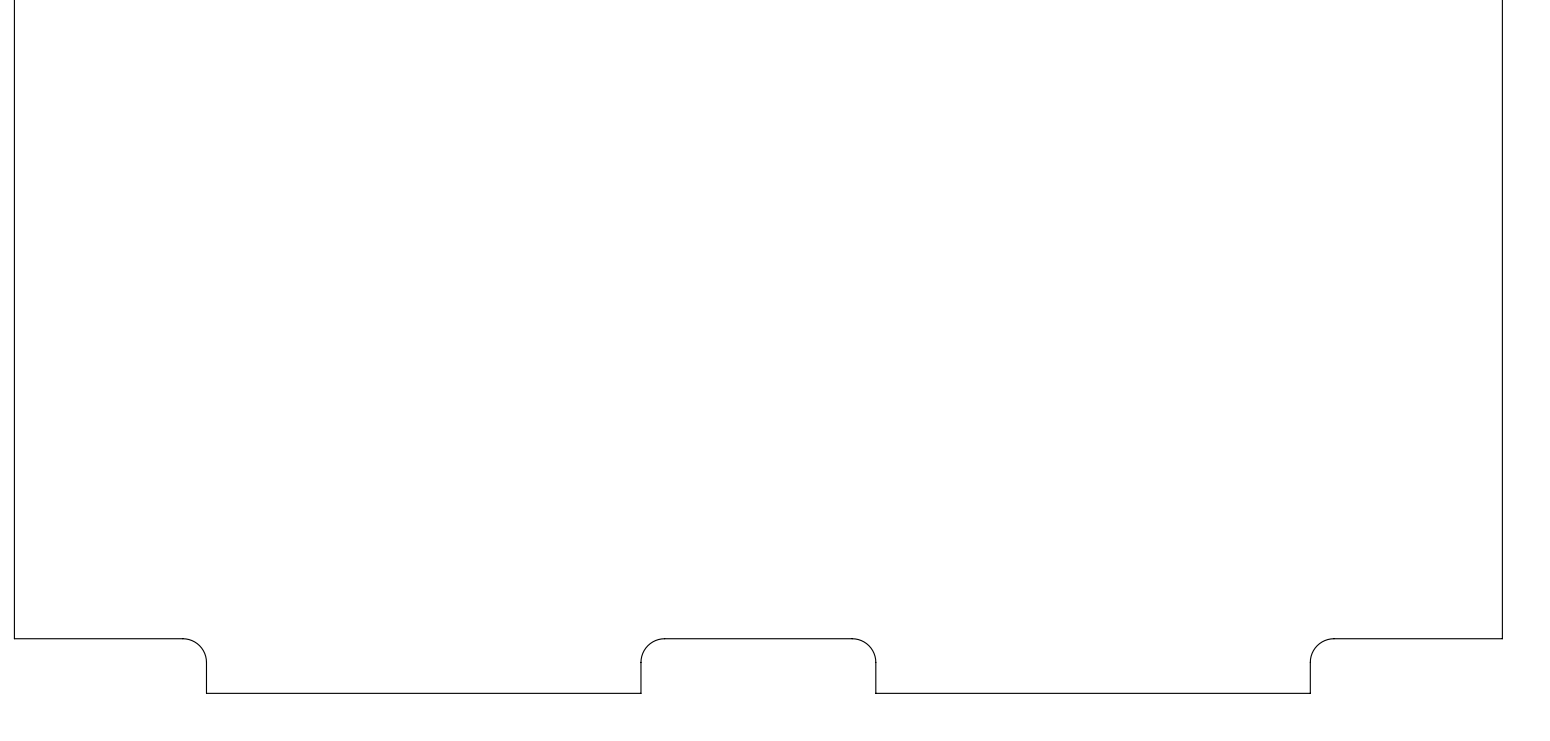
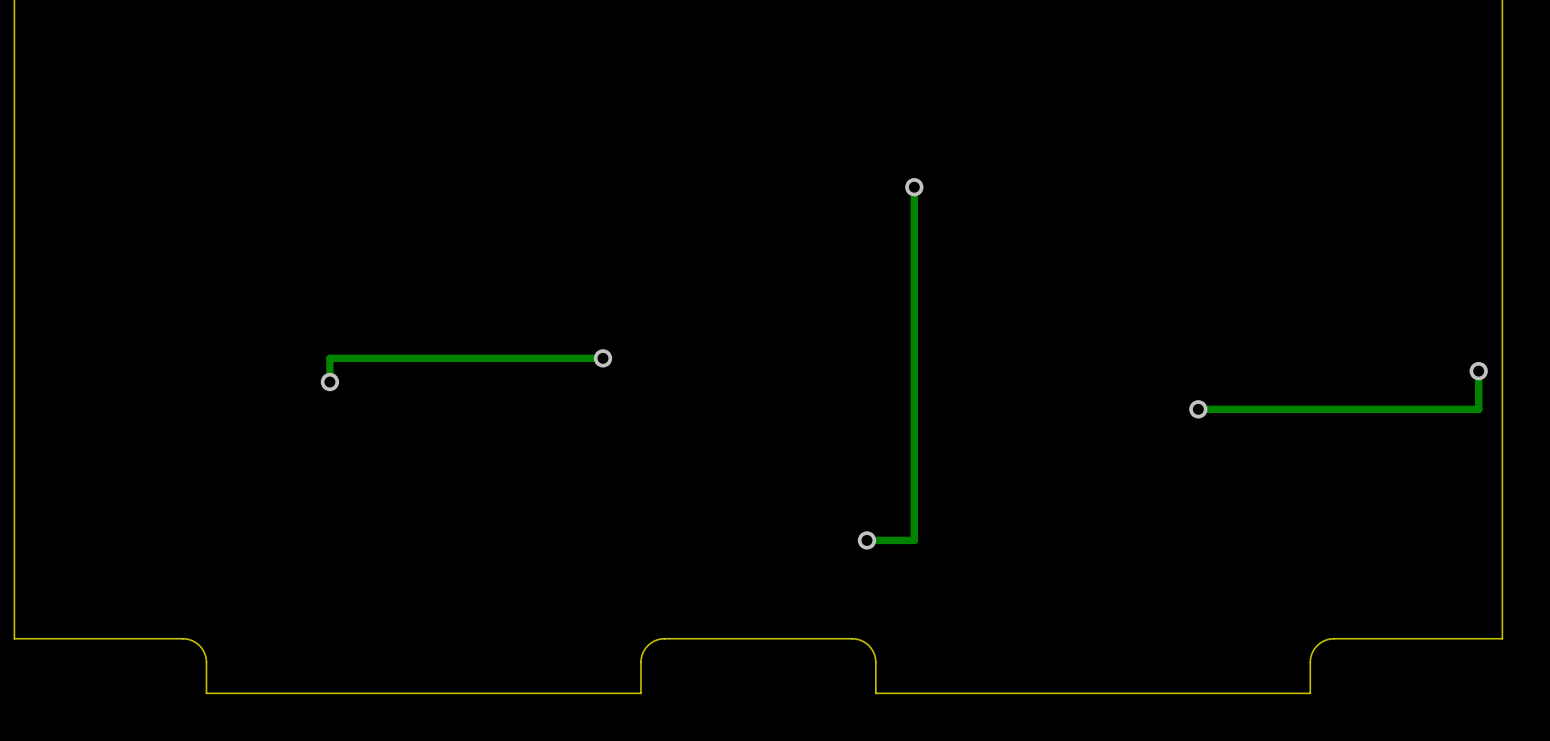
track: none -> (914, 187) (914, 540) (866, 540)
via: none -> (914, 187)
track: none -> (603, 358) (329, 358) (329, 382)
via: none -> (603, 358)
track: none -> (1478, 371) (1478, 409) (1198, 409)
via: none -> (1478, 371)
via: none -> (329, 382)
via: none -> (1198, 409)
via: none -> (866, 540)

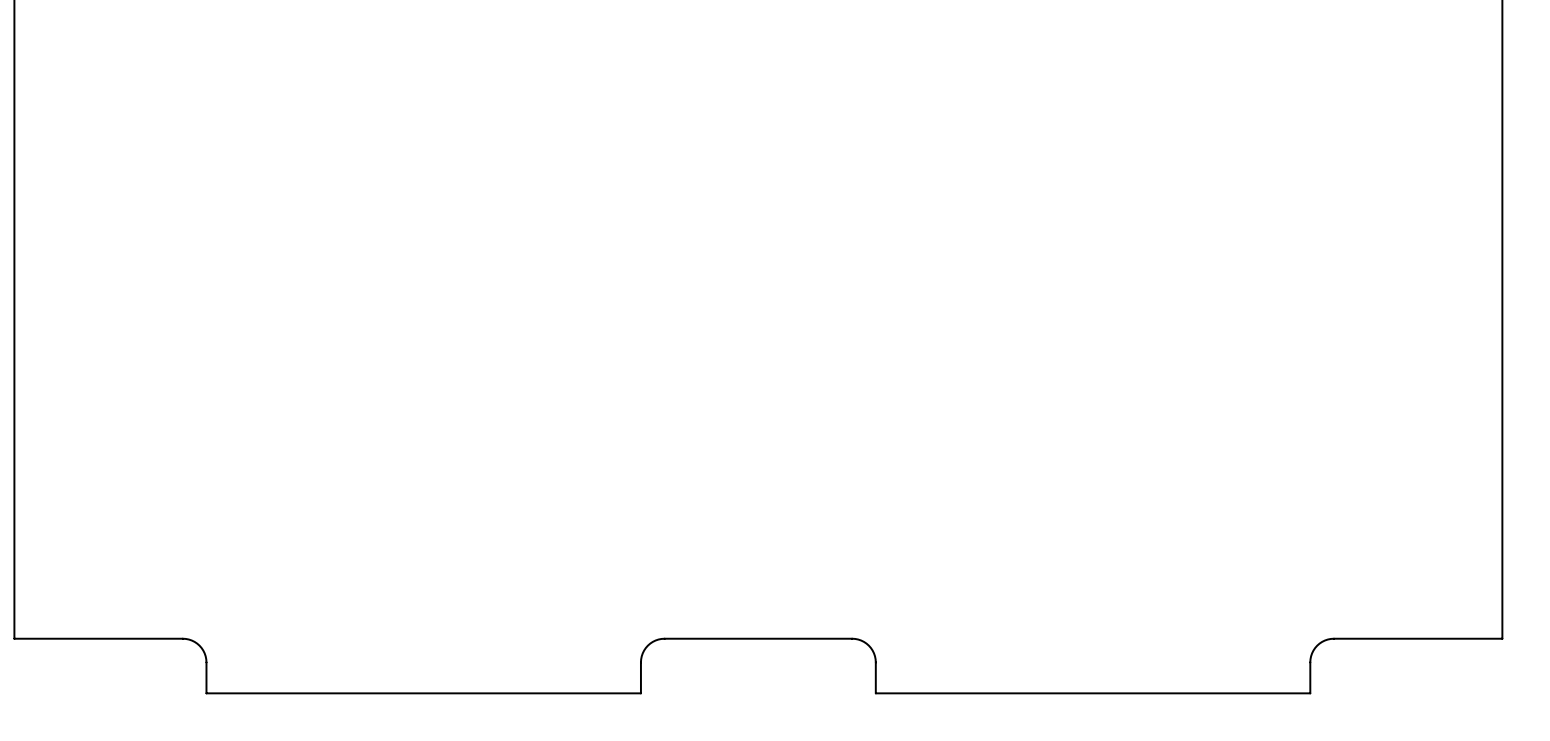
track: (914, 187) (914, 540) (866, 540) -> none
via: (914, 187) -> none
track: (603, 358) (329, 358) (329, 382) -> none
via: (603, 358) -> none
track: (1478, 371) (1478, 409) (1198, 409) -> none
via: (1478, 371) -> none
via: (329, 382) -> none
via: (1198, 409) -> none
via: (866, 540) -> none

